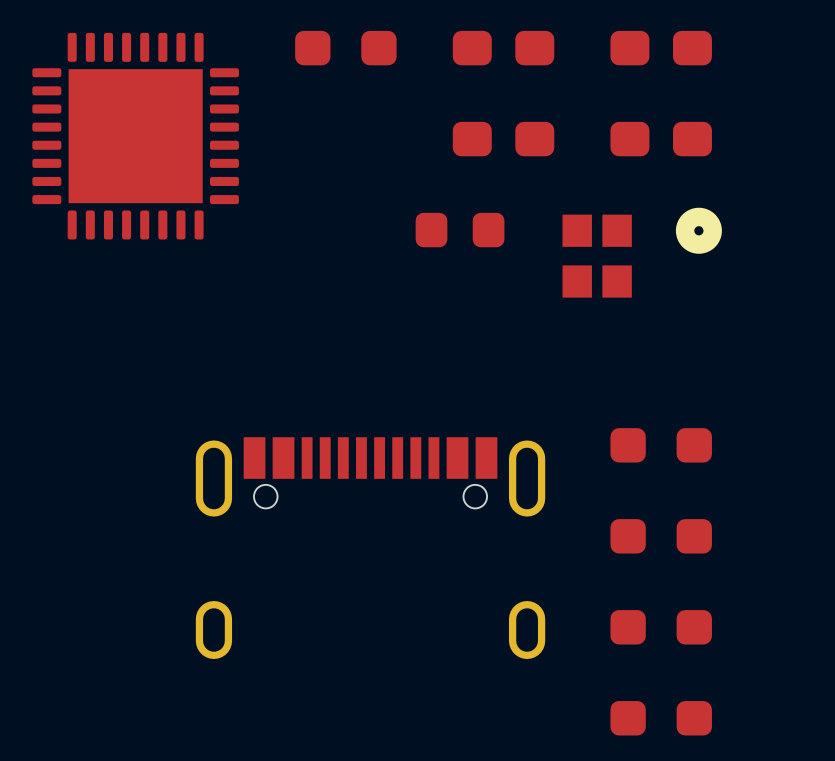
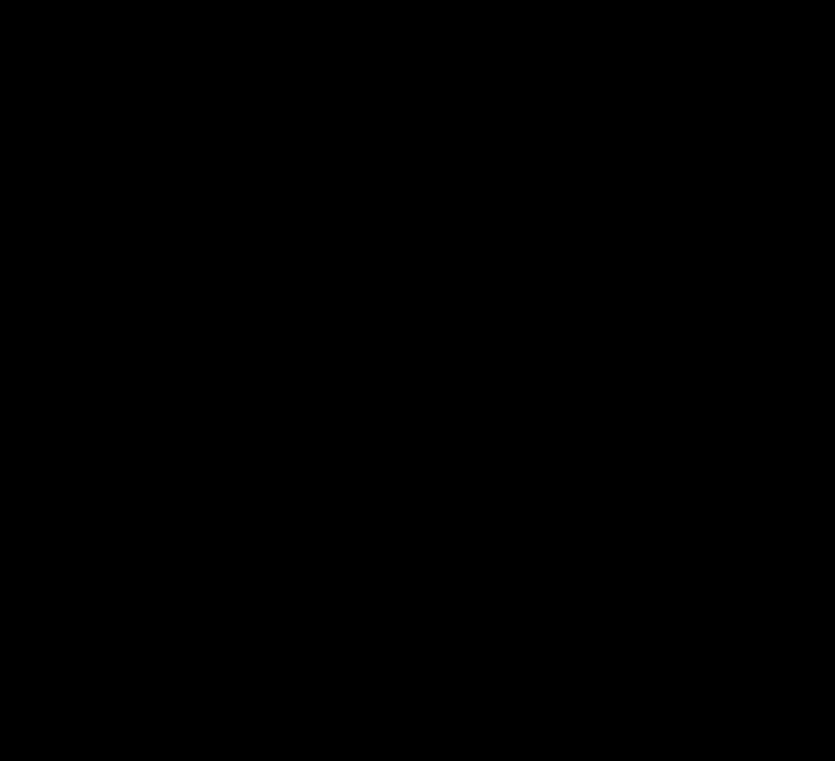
part: (345, 48) -> none
part: (503, 48) -> none
part: (661, 48) -> none
part: (135, 136) -> none
part: (503, 139) -> none
part: (661, 139) -> none
part: (460, 230) -> none
part: (642, 252) -> none
part: (661, 445) -> none
part: (661, 536) -> none
part: (370, 548) -> none
part: (661, 627) -> none
part: (661, 718) -> none

